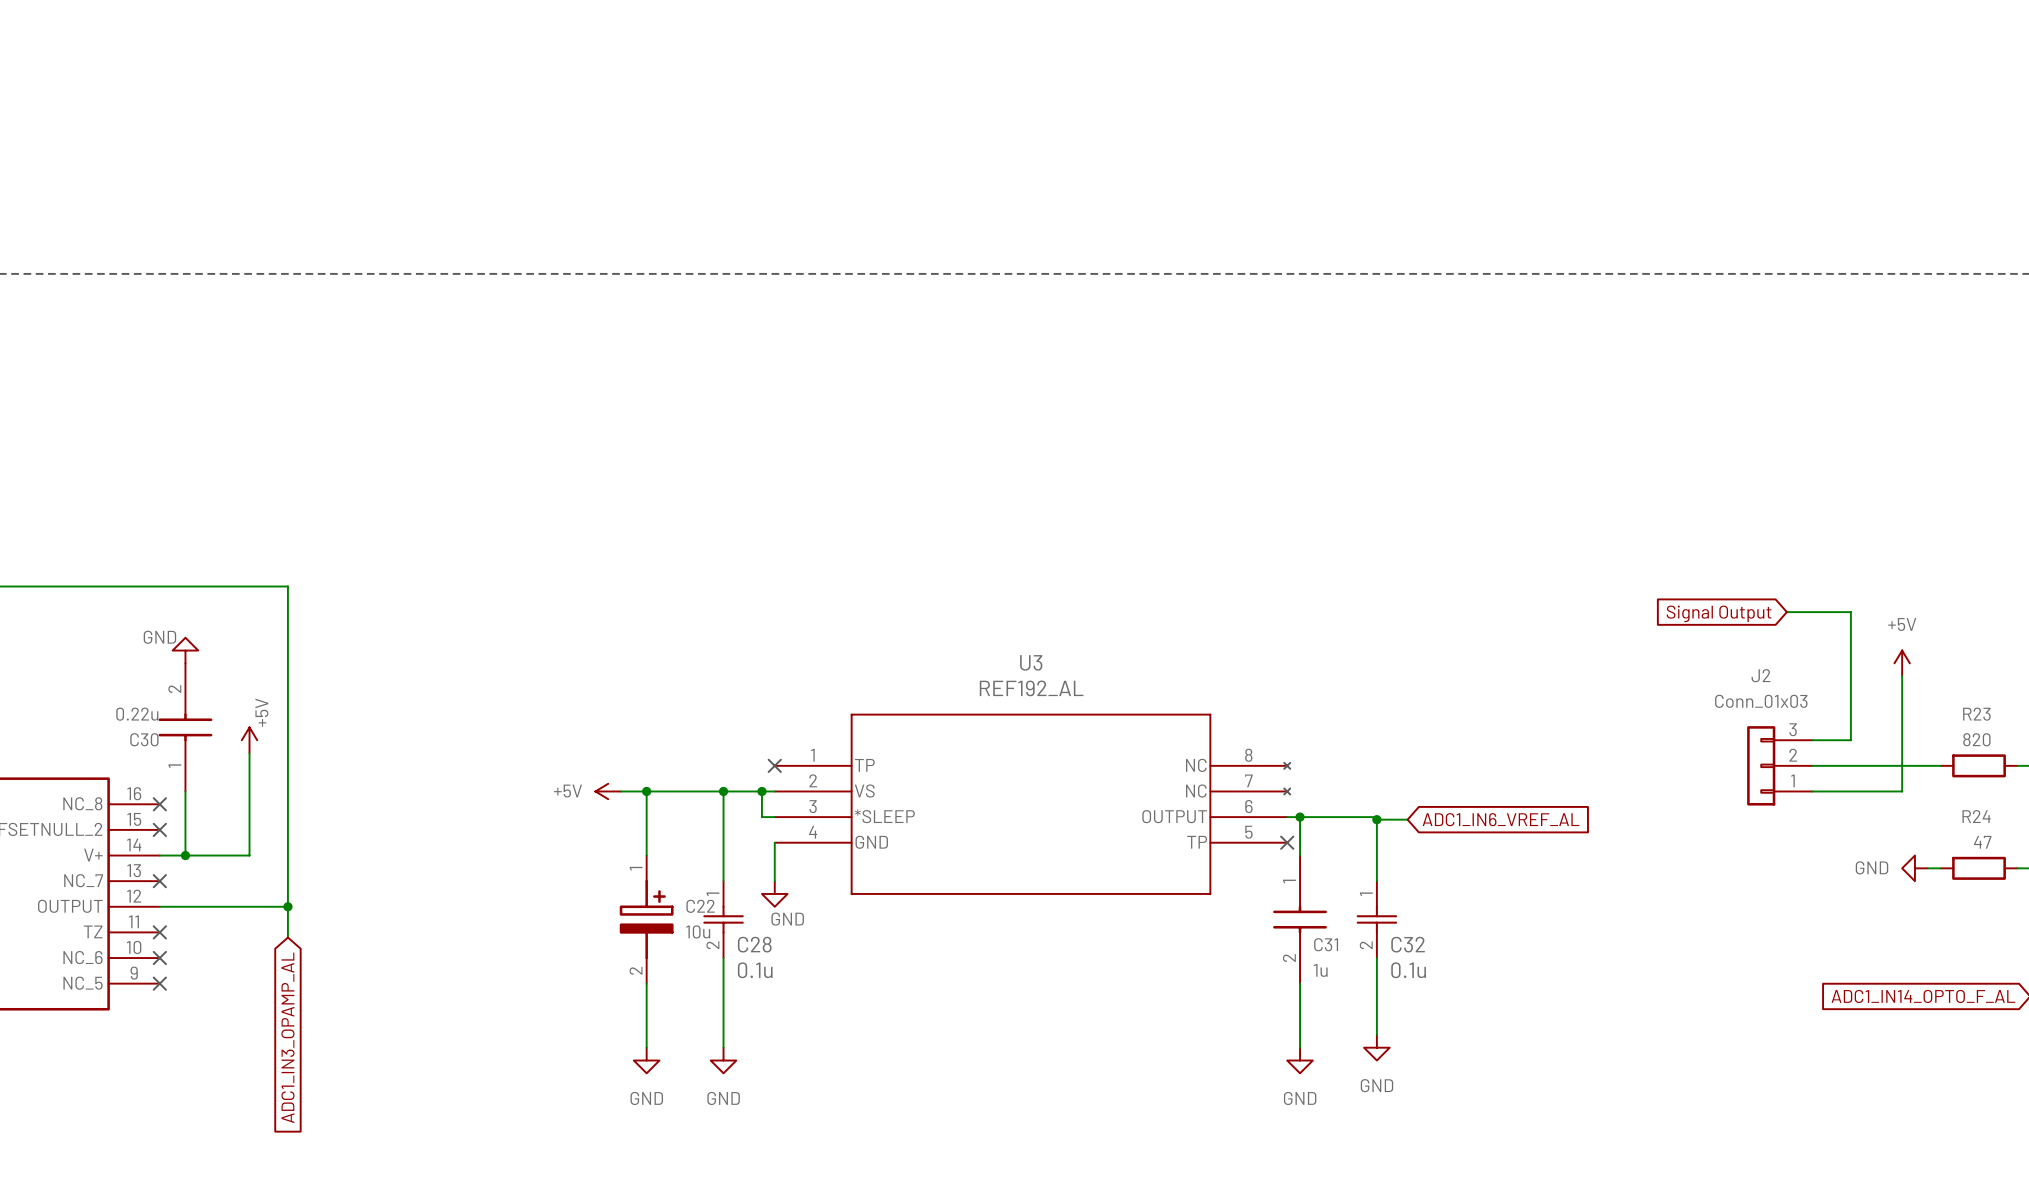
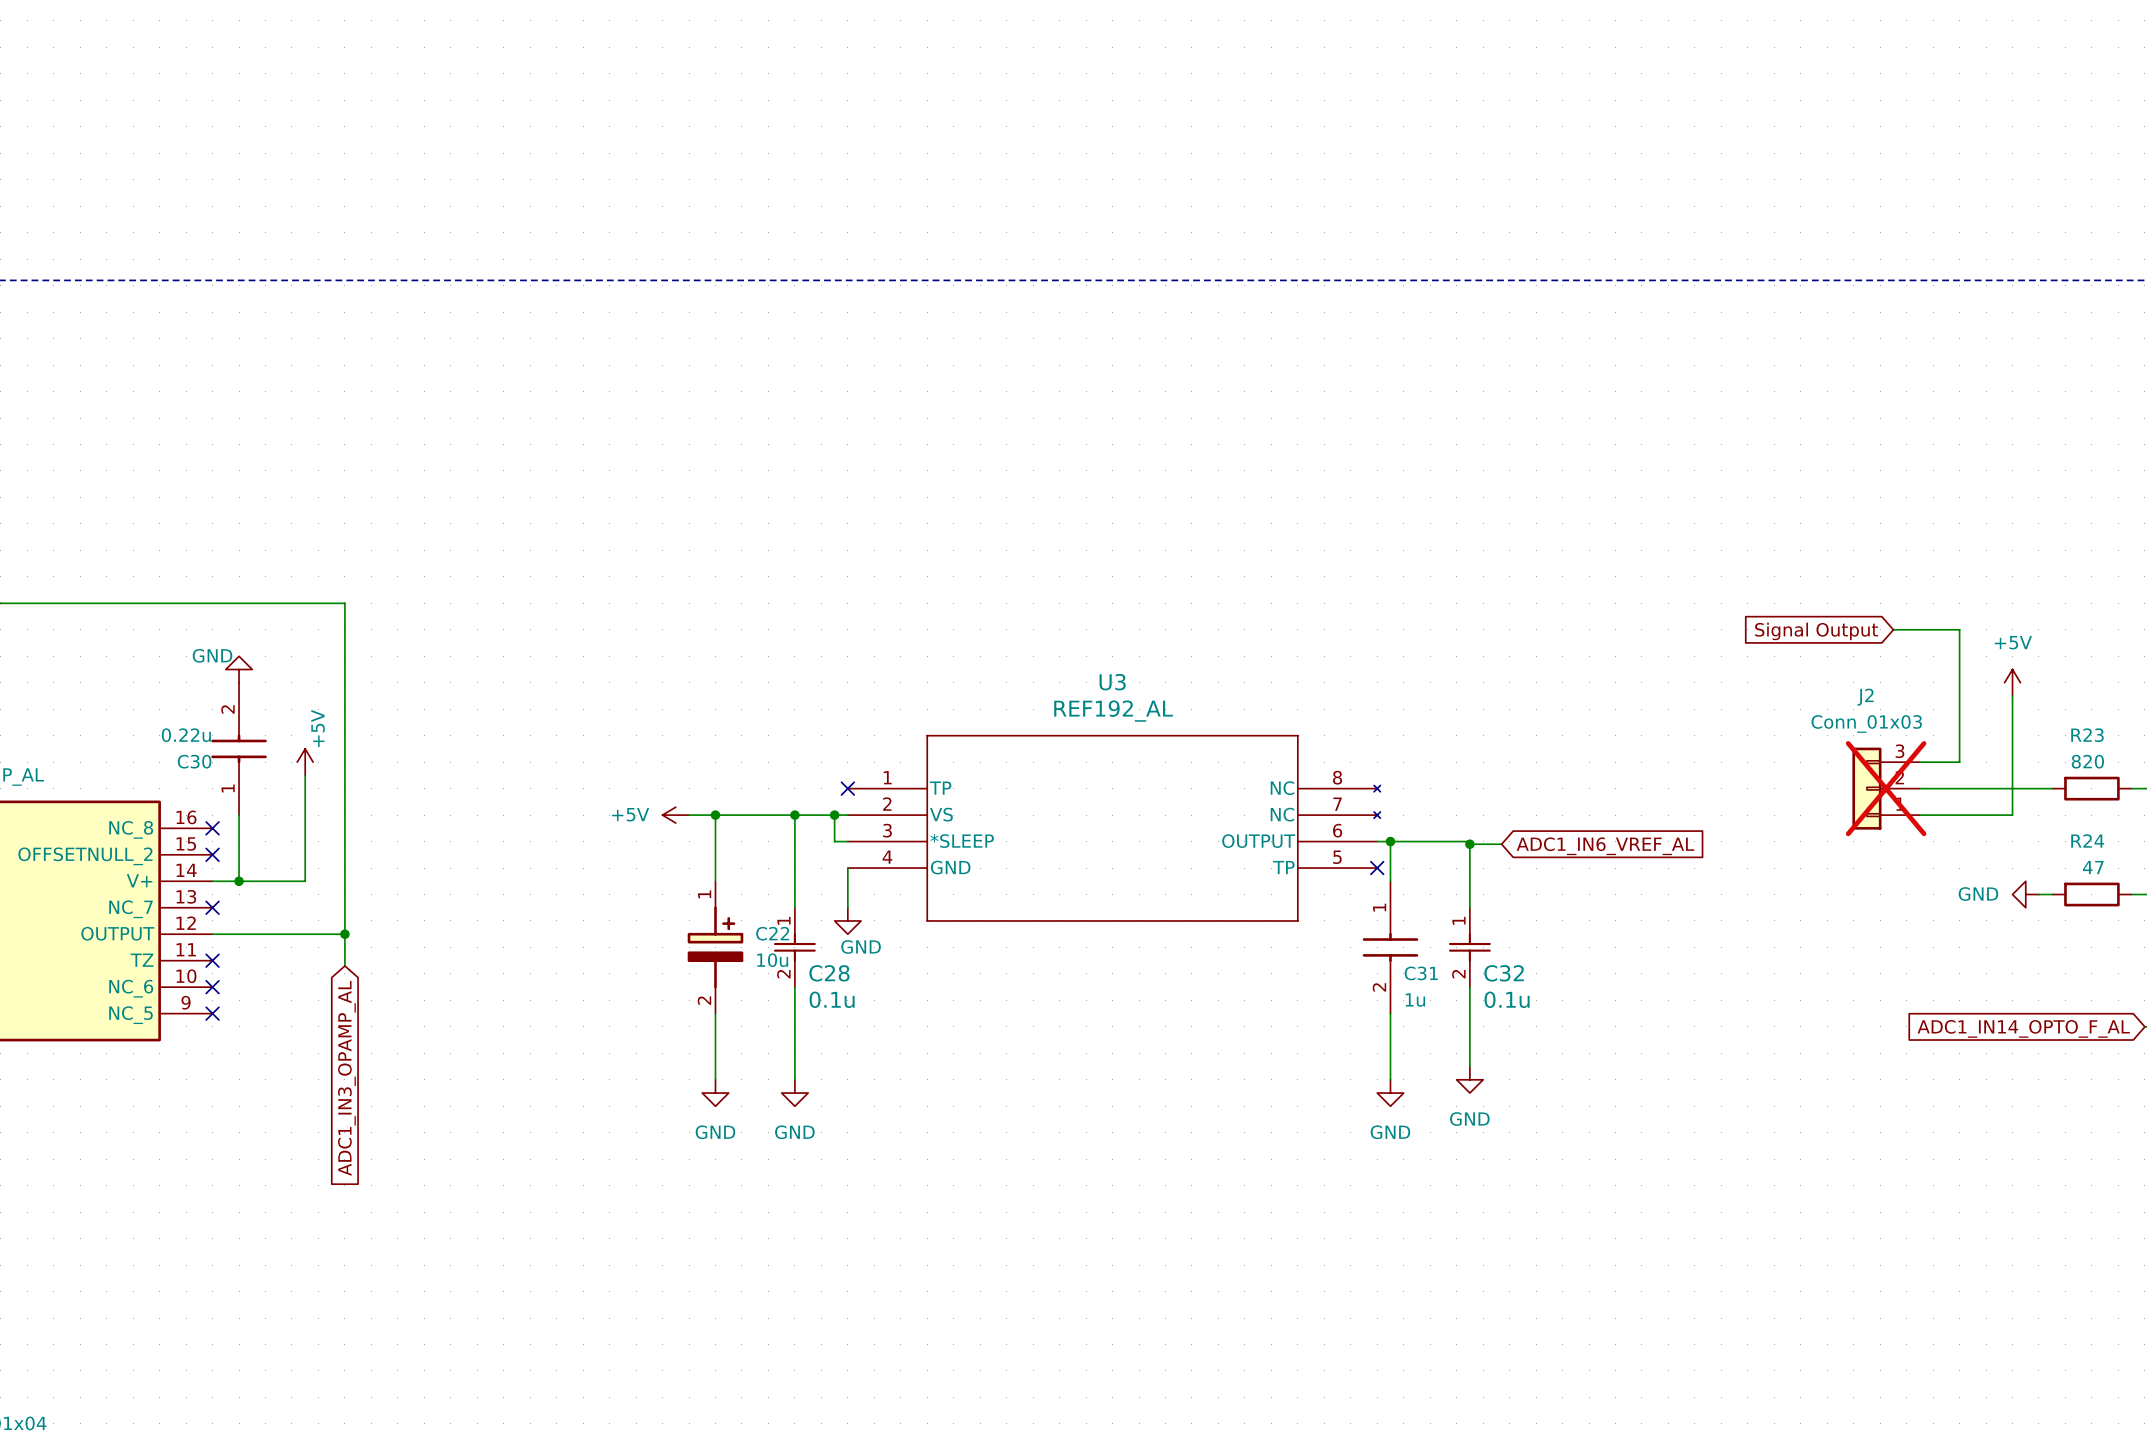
J2 do-not-place cross: none -> (1886, 788)

